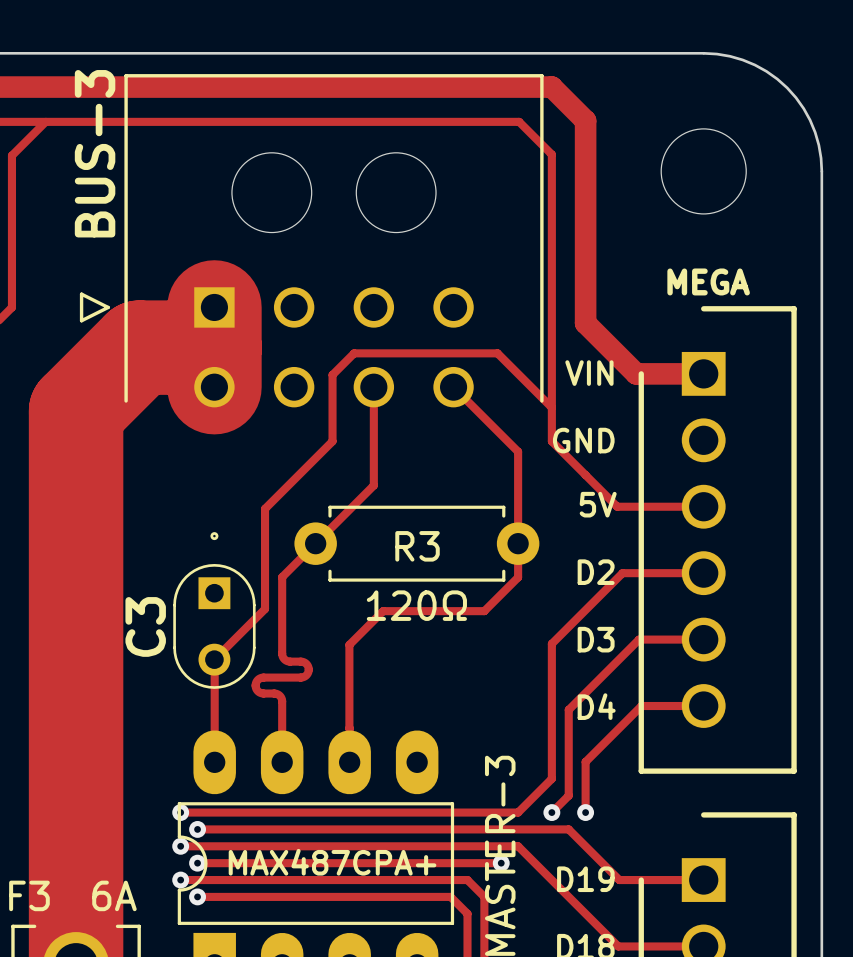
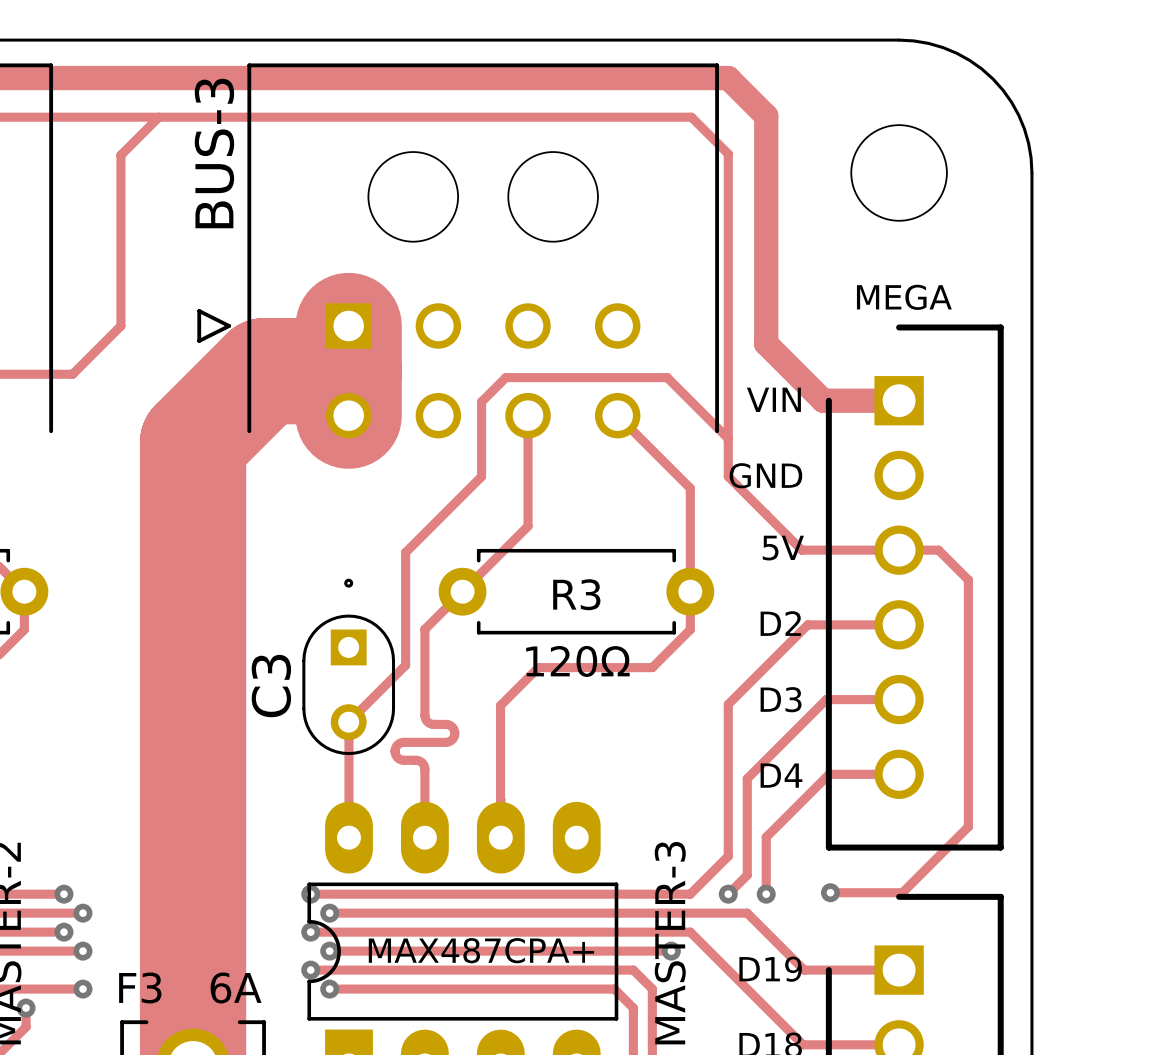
track: none -> (899, 550) (938, 550) (968, 580) (968, 826) (902, 892) (830, 892)
via: none -> (830, 892)

